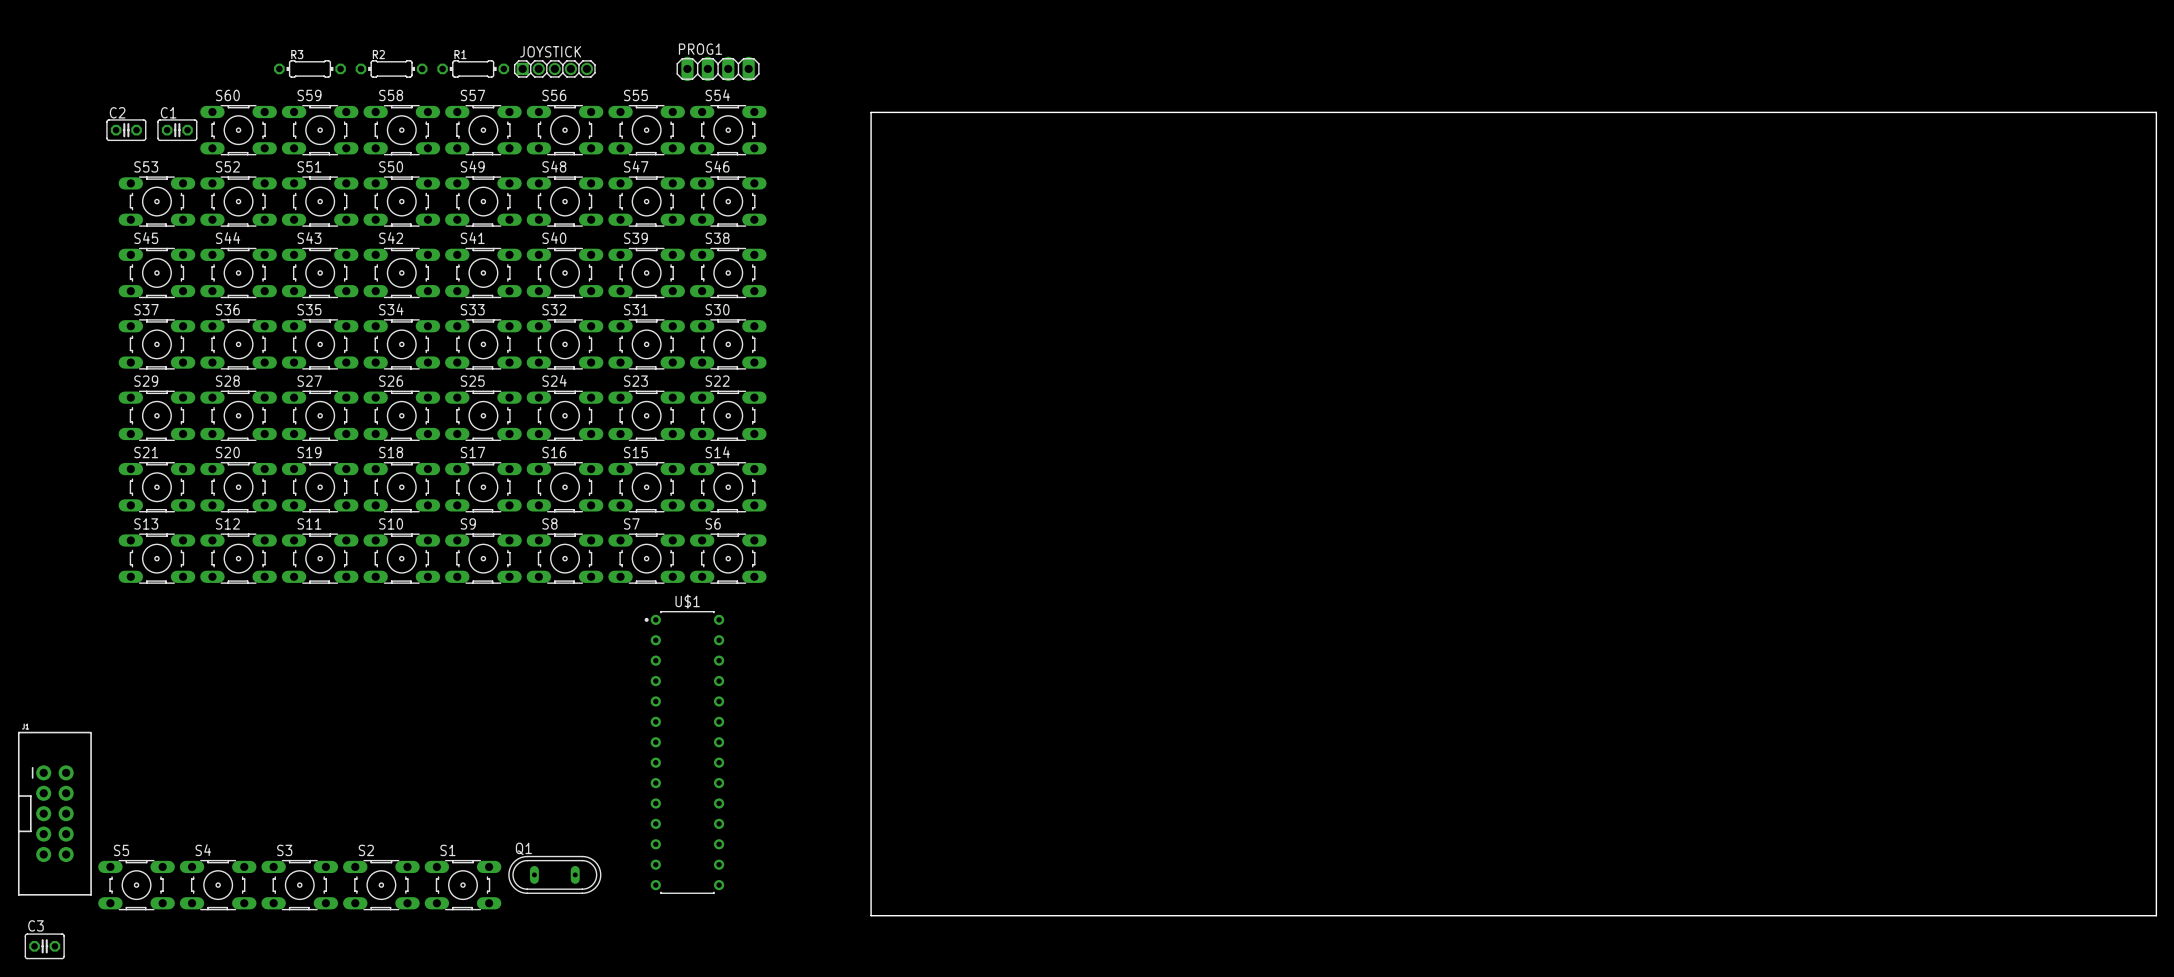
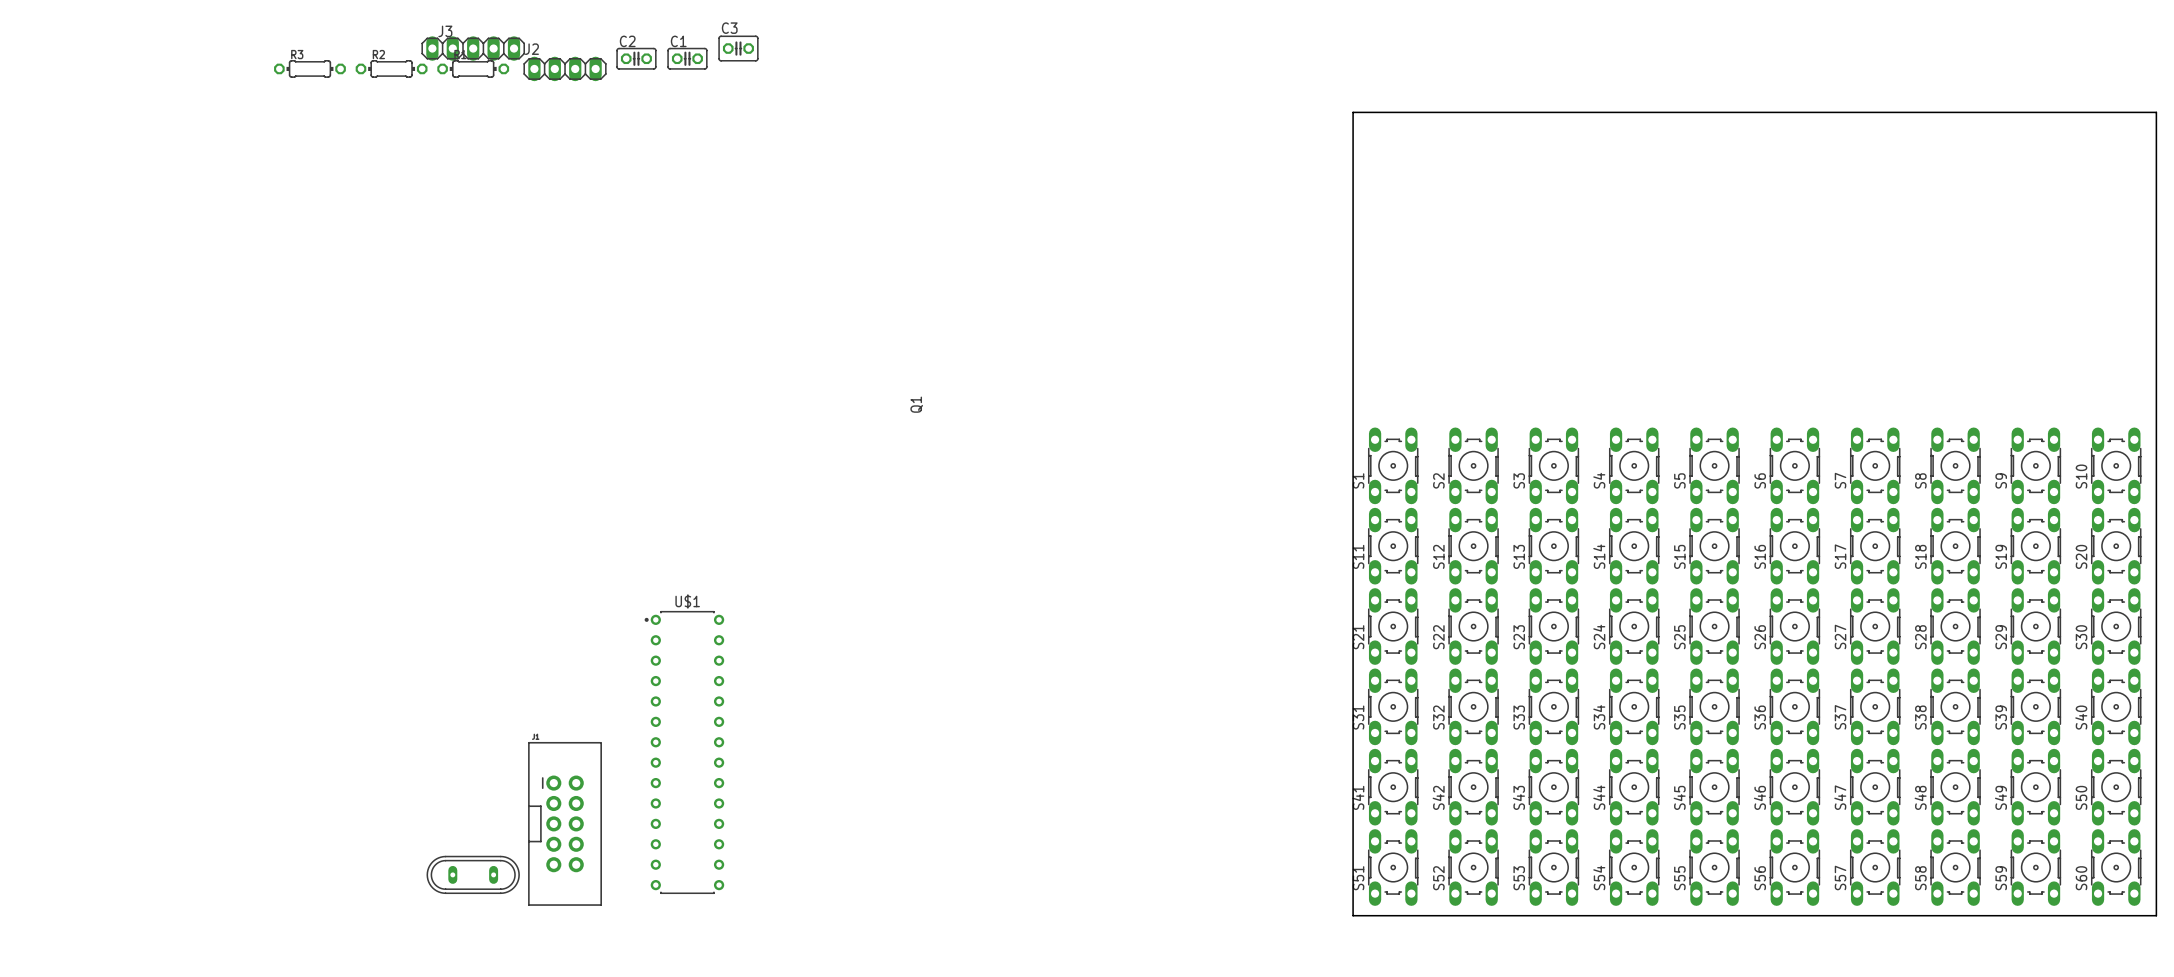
J3: none -> (473, 48)
JOYSTICK: (554, 68) -> none
J2: none -> (565, 68)
PROG1: (718, 68) -> none
board edge: (1353, 112) (871, 112) (871, 915) (1353, 915) -> (1353, 112) (1353, 915)
C2 position: (126, 130) -> (636, 58)
C1 position: (177, 130) -> (687, 58)
S60 rotation: 0° (238, 130) -> 90° counterclockwise (2116, 867)
S60 position: (238, 130) -> (2116, 867)
S59 rotation: 0° (320, 130) -> 90° counterclockwise (2035, 867)
S59 position: (320, 130) -> (2035, 867)
S58 rotation: 0° (401, 130) -> 90° counterclockwise (1955, 867)
S58 position: (401, 130) -> (1955, 867)
S57 rotation: 0° (483, 130) -> 90° counterclockwise (1875, 867)
S57 position: (483, 130) -> (1875, 867)
S56 rotation: 0° (565, 130) -> 90° counterclockwise (1794, 867)
S56 position: (565, 130) -> (1794, 867)
S55 rotation: 0° (646, 130) -> 90° counterclockwise (1714, 867)
S55 position: (646, 130) -> (1714, 867)
S54 rotation: 0° (728, 130) -> 90° counterclockwise (1634, 867)
S54 position: (728, 130) -> (1634, 867)
S53 rotation: 0° (156, 201) -> 90° counterclockwise (1553, 867)
S53 position: (156, 201) -> (1553, 867)
S52 rotation: 0° (238, 201) -> 90° counterclockwise (1473, 867)
S52 position: (238, 201) -> (1473, 867)
S51 rotation: 0° (320, 201) -> 90° counterclockwise (1393, 867)
S51 position: (320, 201) -> (1393, 867)
S50 rotation: 0° (401, 201) -> 90° counterclockwise (2116, 787)
S50 position: (401, 201) -> (2116, 787)
S49 rotation: 0° (483, 201) -> 90° counterclockwise (2035, 787)
S49 position: (483, 201) -> (2035, 787)
S48 rotation: 0° (565, 201) -> 90° counterclockwise (1955, 787)
S48 position: (565, 201) -> (1955, 787)
S47 rotation: 0° (646, 201) -> 90° counterclockwise (1875, 787)
S47 position: (646, 201) -> (1875, 787)
S46 rotation: 0° (728, 201) -> 90° counterclockwise (1794, 787)
S46 position: (728, 201) -> (1794, 787)
S45 rotation: 0° (156, 272) -> 90° counterclockwise (1714, 787)
S45 position: (156, 272) -> (1714, 787)
S44 rotation: 0° (238, 272) -> 90° counterclockwise (1634, 787)
S44 position: (238, 272) -> (1634, 787)
S43 rotation: 0° (320, 272) -> 90° counterclockwise (1553, 787)
S43 position: (320, 272) -> (1553, 787)
S42 rotation: 0° (401, 272) -> 90° counterclockwise (1473, 787)
S42 position: (401, 272) -> (1473, 787)
S41 rotation: 0° (483, 272) -> 90° counterclockwise (1393, 787)
S41 position: (483, 272) -> (1393, 787)
S40 rotation: 0° (565, 272) -> 90° counterclockwise (2116, 706)
S40 position: (565, 272) -> (2116, 706)
S39 rotation: 0° (646, 272) -> 90° counterclockwise (2035, 706)
S39 position: (646, 272) -> (2035, 706)
S38 rotation: 0° (728, 272) -> 90° counterclockwise (1955, 706)
S38 position: (728, 272) -> (1955, 706)
S37 rotation: 0° (156, 344) -> 90° counterclockwise (1875, 706)
S37 position: (156, 344) -> (1875, 706)
S36 rotation: 0° (238, 344) -> 90° counterclockwise (1794, 706)
S36 position: (238, 344) -> (1794, 706)
S35 rotation: 0° (320, 344) -> 90° counterclockwise (1714, 706)
S35 position: (320, 344) -> (1714, 706)
S34 rotation: 0° (401, 344) -> 90° counterclockwise (1634, 706)
S34 position: (401, 344) -> (1634, 706)
S33 rotation: 0° (483, 344) -> 90° counterclockwise (1553, 706)
S33 position: (483, 344) -> (1553, 706)
S32 rotation: 0° (565, 344) -> 90° counterclockwise (1473, 706)
S32 position: (565, 344) -> (1473, 706)
S31 rotation: 0° (646, 344) -> 90° counterclockwise (1393, 706)
S31 position: (646, 344) -> (1393, 706)
S30 rotation: 0° (728, 344) -> 90° counterclockwise (2116, 626)
S30 position: (728, 344) -> (2116, 626)
S29 rotation: 0° (156, 415) -> 90° counterclockwise (2035, 626)
S29 position: (156, 415) -> (2035, 626)
S28 rotation: 0° (238, 415) -> 90° counterclockwise (1955, 626)
S28 position: (238, 415) -> (1955, 626)
S27 rotation: 0° (320, 415) -> 90° counterclockwise (1875, 626)
S27 position: (320, 415) -> (1875, 626)
S26 rotation: 0° (401, 415) -> 90° counterclockwise (1794, 626)
S26 position: (401, 415) -> (1794, 626)
S25 rotation: 0° (483, 415) -> 90° counterclockwise (1714, 626)
S25 position: (483, 415) -> (1714, 626)
S24 rotation: 0° (565, 415) -> 90° counterclockwise (1634, 626)
S24 position: (565, 415) -> (1634, 626)
S23 rotation: 0° (646, 415) -> 90° counterclockwise (1553, 626)
S23 position: (646, 415) -> (1553, 626)
S22 rotation: 0° (728, 415) -> 90° counterclockwise (1473, 626)
S22 position: (728, 415) -> (1473, 626)
S21 rotation: 0° (156, 487) -> 90° counterclockwise (1393, 626)
S21 position: (156, 487) -> (1393, 626)
S20 rotation: 0° (238, 487) -> 90° counterclockwise (2116, 546)
S20 position: (238, 487) -> (2116, 546)
S19 rotation: 0° (320, 487) -> 90° counterclockwise (2035, 546)
S19 position: (320, 487) -> (2035, 546)
S18 rotation: 0° (401, 487) -> 90° counterclockwise (1955, 546)
S18 position: (401, 487) -> (1955, 546)
S17 rotation: 0° (483, 487) -> 90° counterclockwise (1875, 546)
S17 position: (483, 487) -> (1875, 546)
S16 rotation: 0° (565, 487) -> 90° counterclockwise (1794, 546)
S16 position: (565, 487) -> (1794, 546)
S15 rotation: 0° (646, 487) -> 90° counterclockwise (1714, 546)
S15 position: (646, 487) -> (1714, 546)
S14 rotation: 0° (728, 487) -> 90° counterclockwise (1634, 546)
S14 position: (728, 487) -> (1634, 546)
S13 rotation: 0° (156, 558) -> 90° counterclockwise (1553, 546)
S13 position: (156, 558) -> (1553, 546)
S12 rotation: 0° (238, 558) -> 90° counterclockwise (1473, 546)
S12 position: (238, 558) -> (1473, 546)
S11 rotation: 0° (320, 558) -> 90° counterclockwise (1393, 546)
S11 position: (320, 558) -> (1393, 546)
S10 rotation: 0° (401, 558) -> 90° counterclockwise (2116, 465)
S10 position: (401, 558) -> (2116, 465)
S9 rotation: 0° (483, 558) -> 90° counterclockwise (2035, 465)
S9 position: (483, 558) -> (2035, 465)
S8 rotation: 0° (565, 558) -> 90° counterclockwise (1955, 465)
S8 position: (565, 558) -> (1955, 465)
S7 rotation: 0° (646, 558) -> 90° counterclockwise (1875, 465)
S7 position: (646, 558) -> (1875, 465)
S6 rotation: 0° (728, 558) -> 90° counterclockwise (1794, 465)
S6 position: (728, 558) -> (1794, 465)
part position: (54, 813) -> (565, 823)
Q1 name rotation: 0° (523, 848) -> 90° counterclockwise (916, 404)
Q1 name position: Q1 (523, 848) -> Q1 (916, 404)
Q1 position: (554, 874) -> (473, 874)
S5 rotation: 0° (136, 885) -> 90° counterclockwise (1714, 465)
S5 position: (136, 885) -> (1714, 465)
S4 rotation: 0° (218, 885) -> 90° counterclockwise (1634, 465)
S4 position: (218, 885) -> (1634, 465)
S3 rotation: 0° (299, 885) -> 90° counterclockwise (1553, 465)
S3 position: (299, 885) -> (1553, 465)
S2 rotation: 0° (381, 885) -> 90° counterclockwise (1473, 465)
S2 position: (381, 885) -> (1473, 465)
S1 rotation: 0° (463, 885) -> 90° counterclockwise (1393, 465)
S1 position: (463, 885) -> (1393, 465)
C3 position: (44, 946) -> (738, 48)

